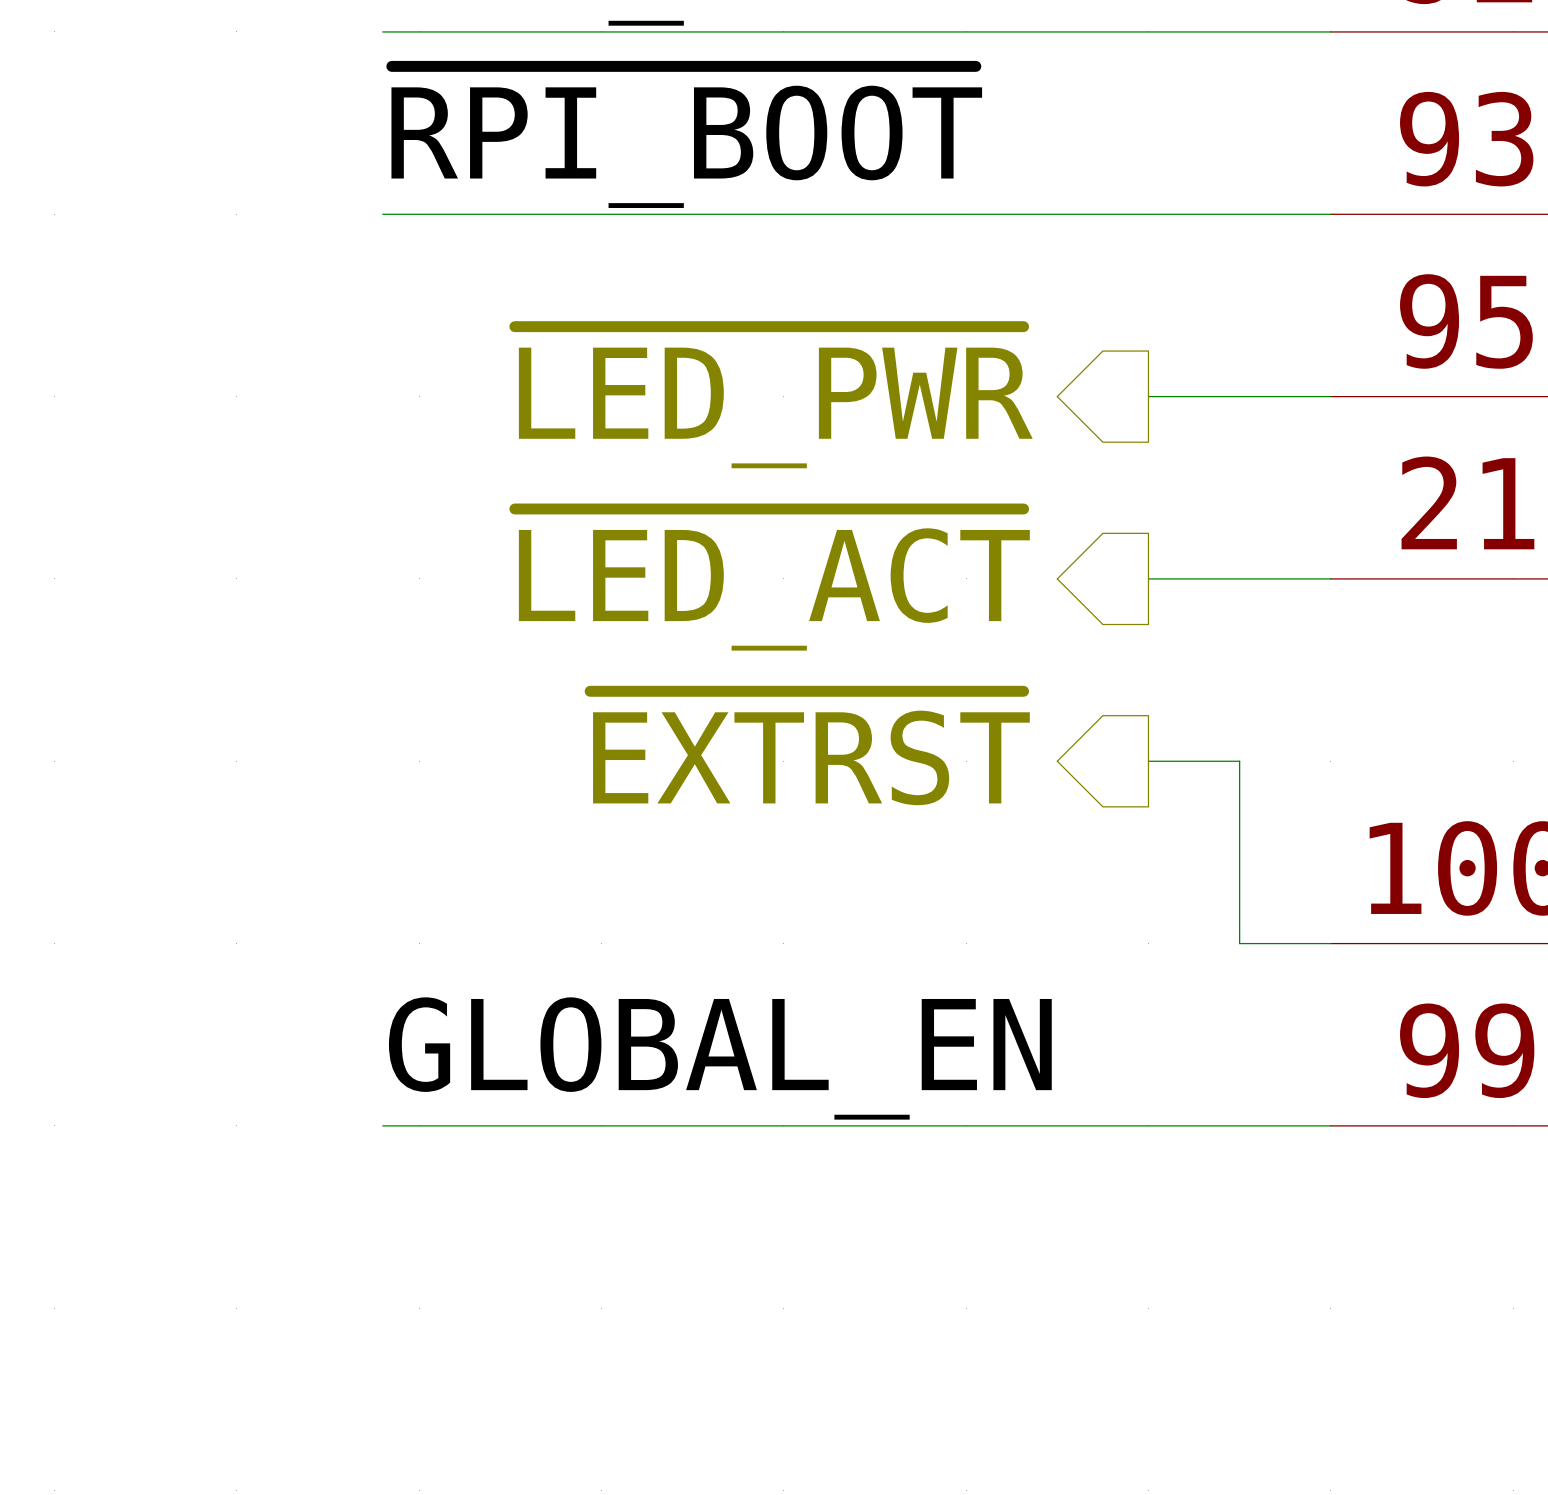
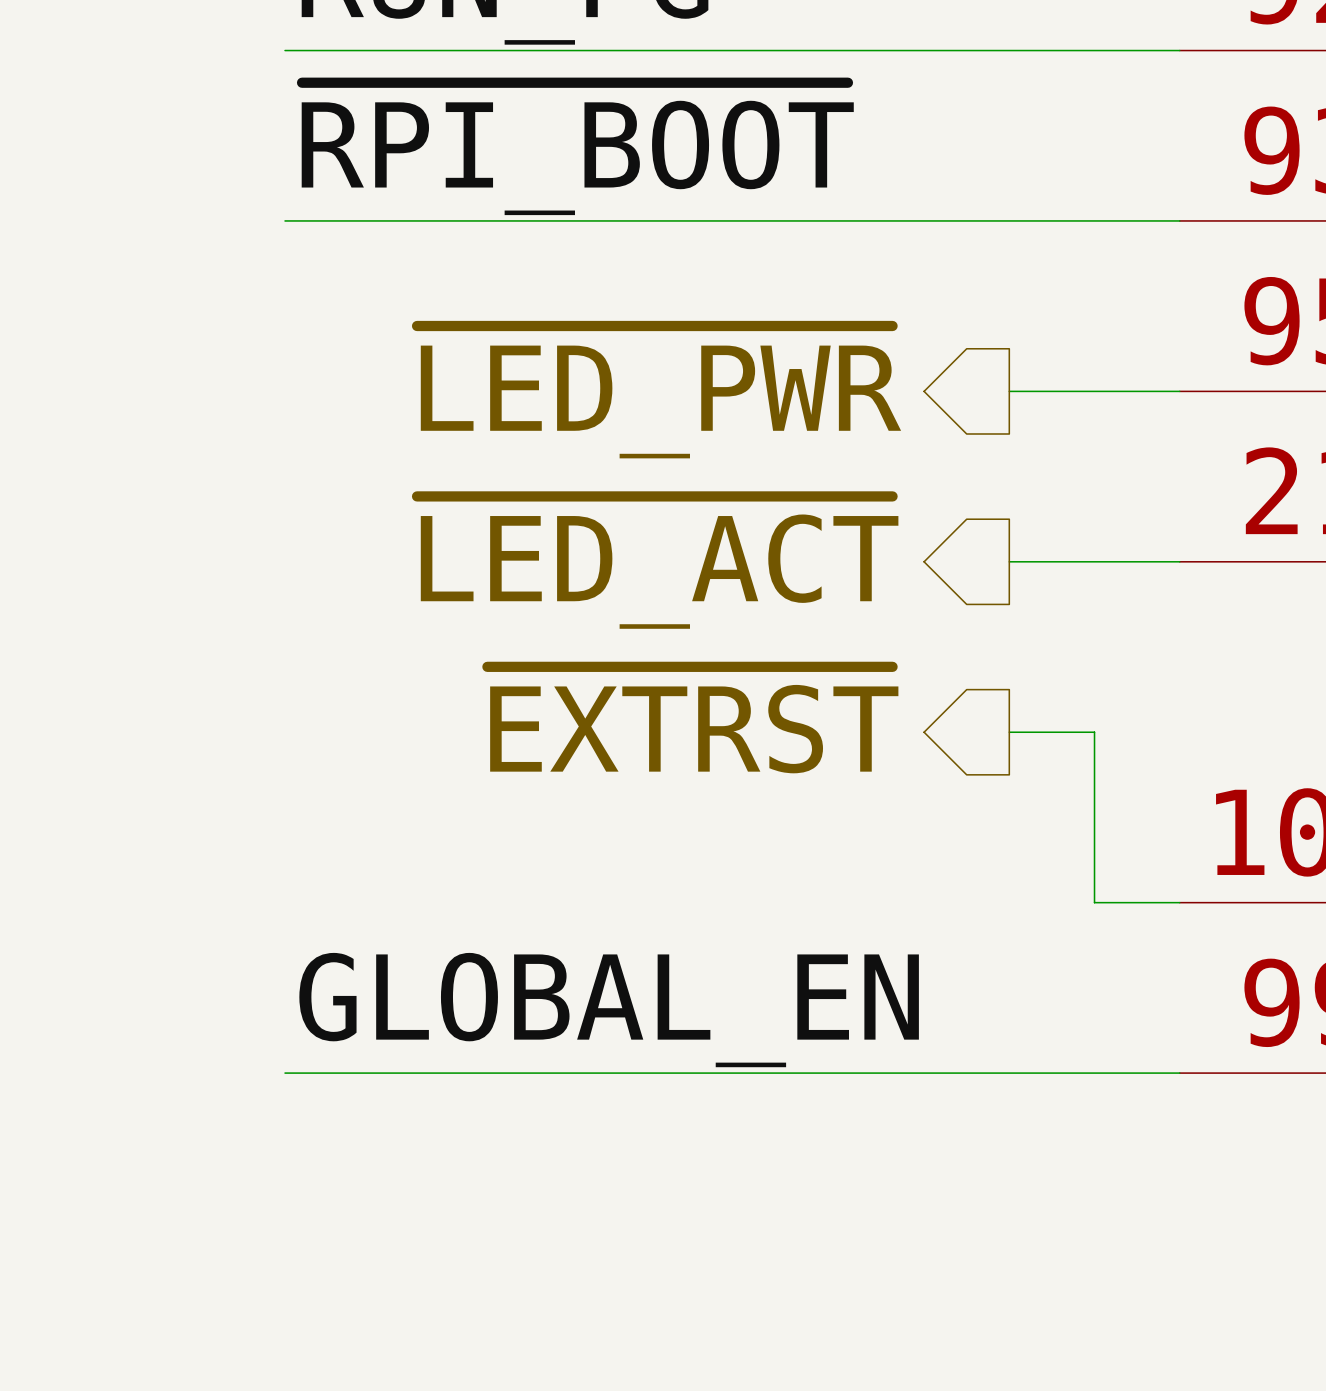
wire: none -> (285, 50) (293, 50)
wire: none -> (285, 220) (293, 220)
wire: none -> (285, 1073) (293, 1073)

